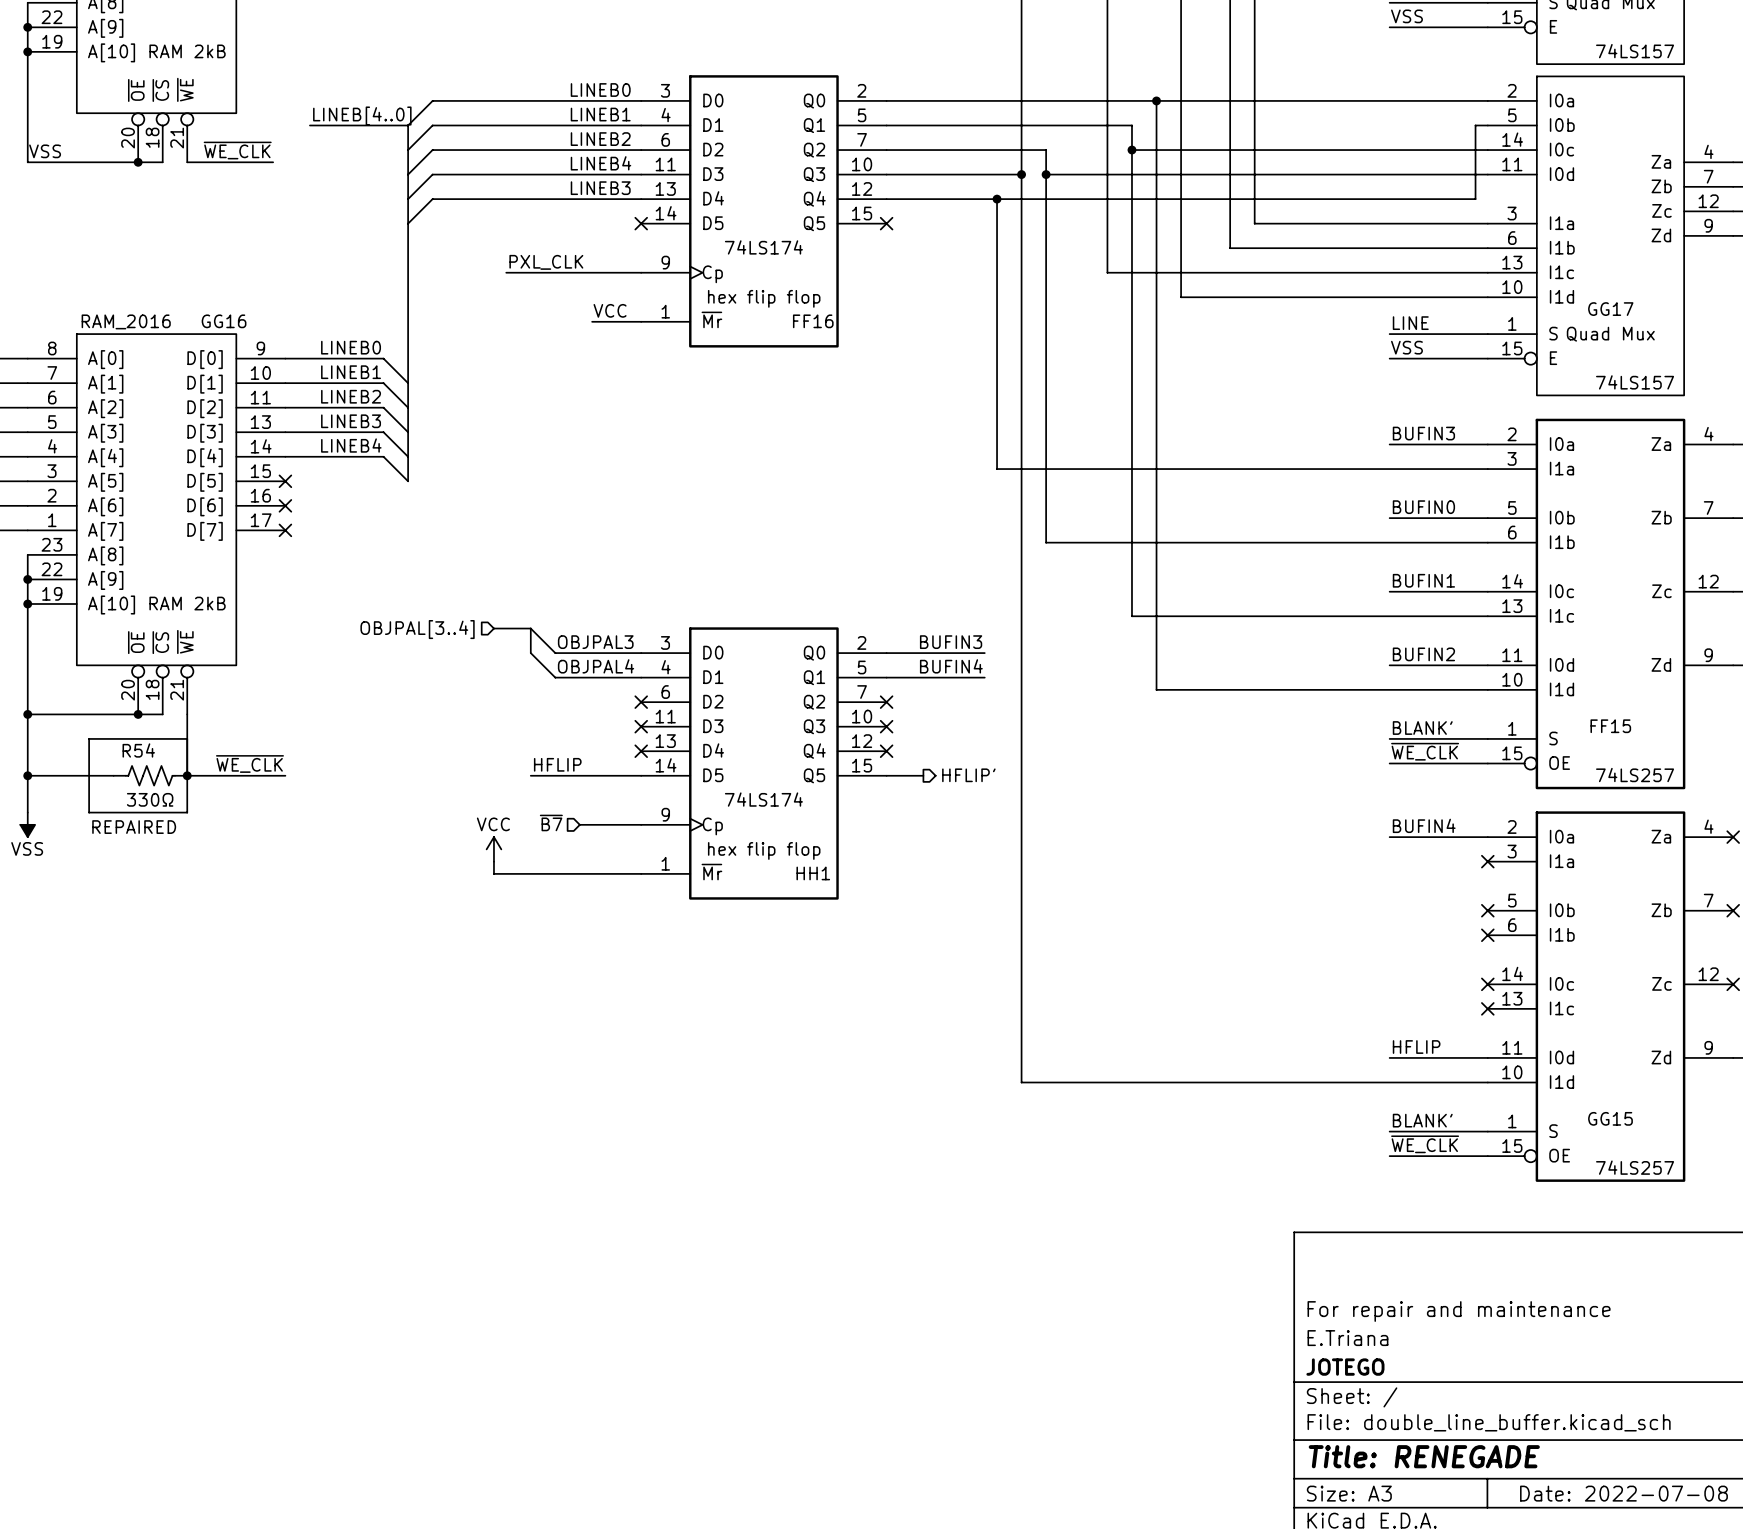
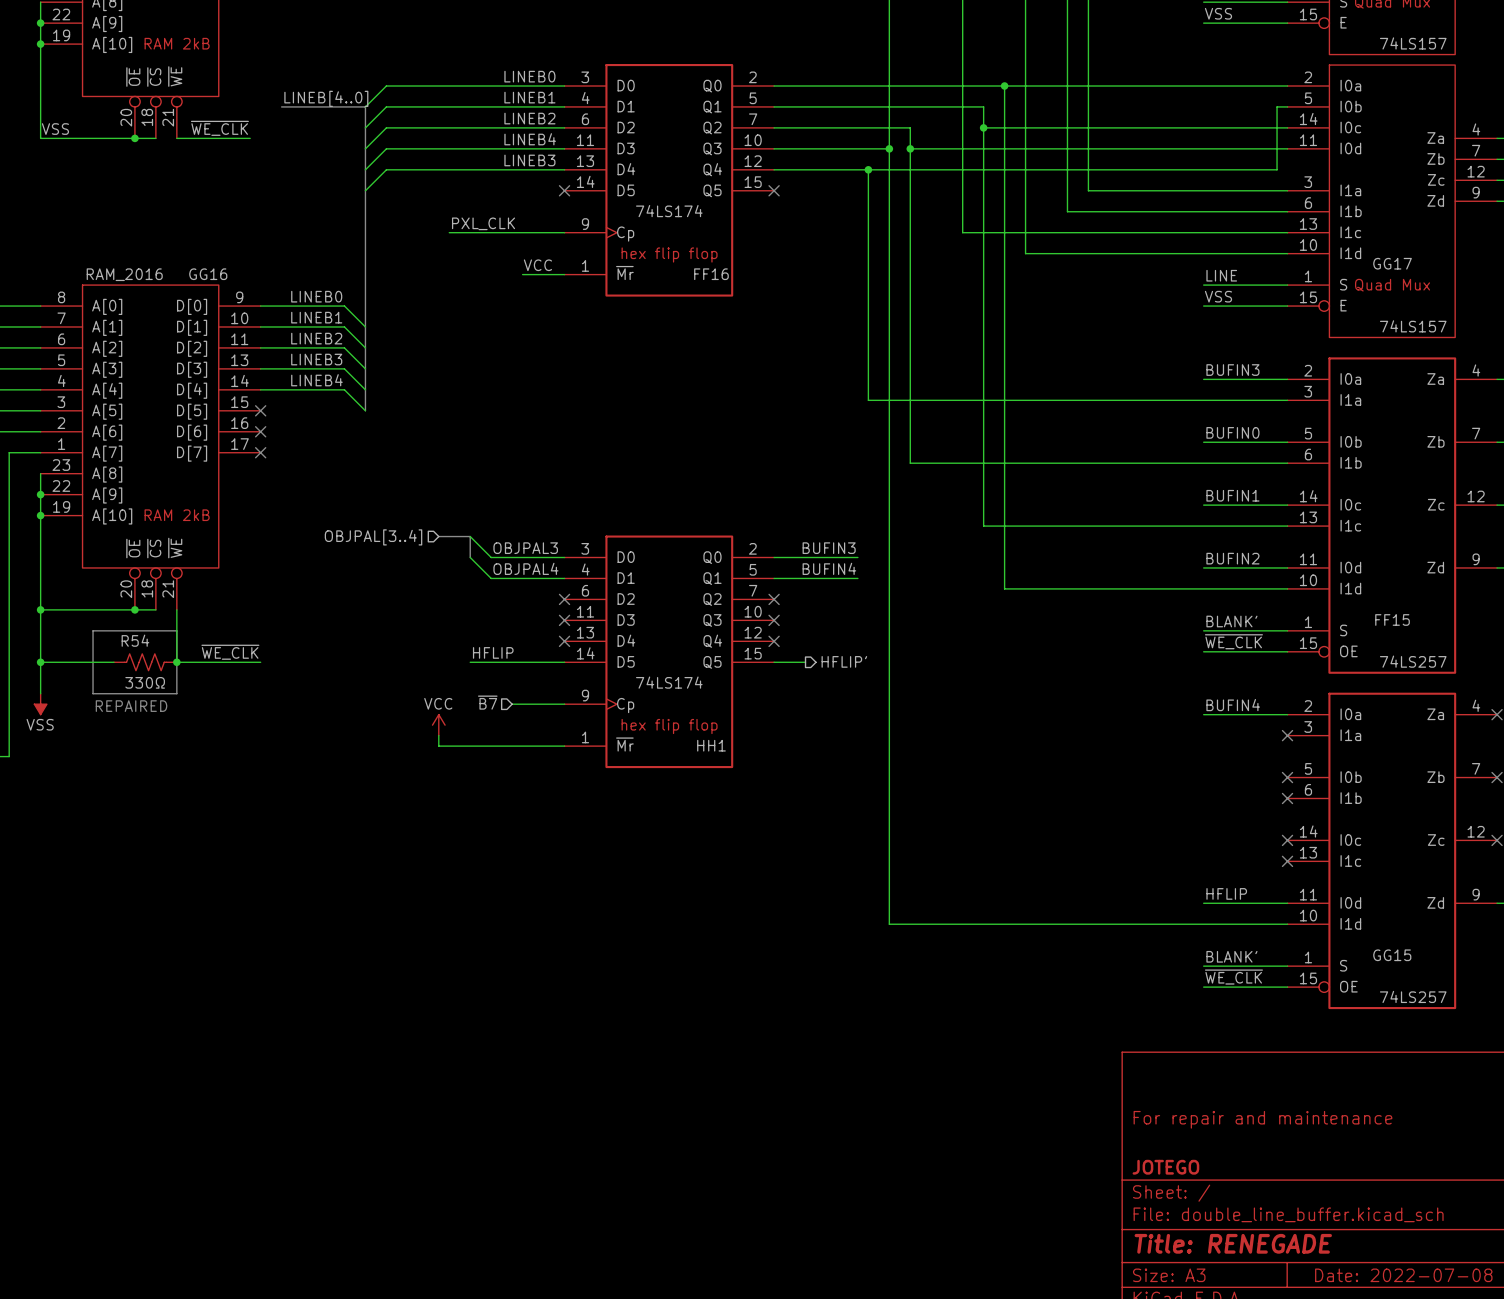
title block: E.Triana (1347, 1338) -> none

